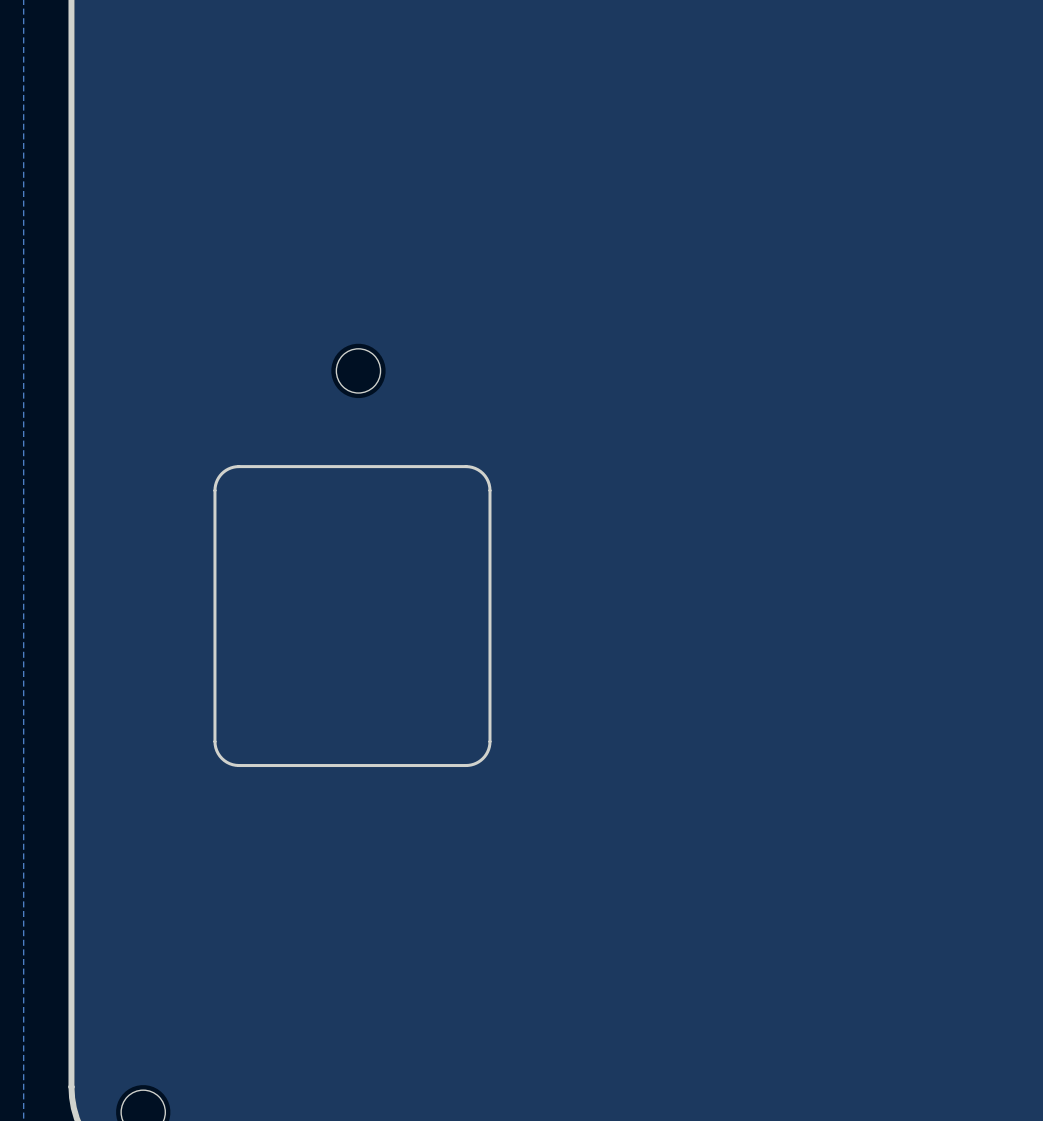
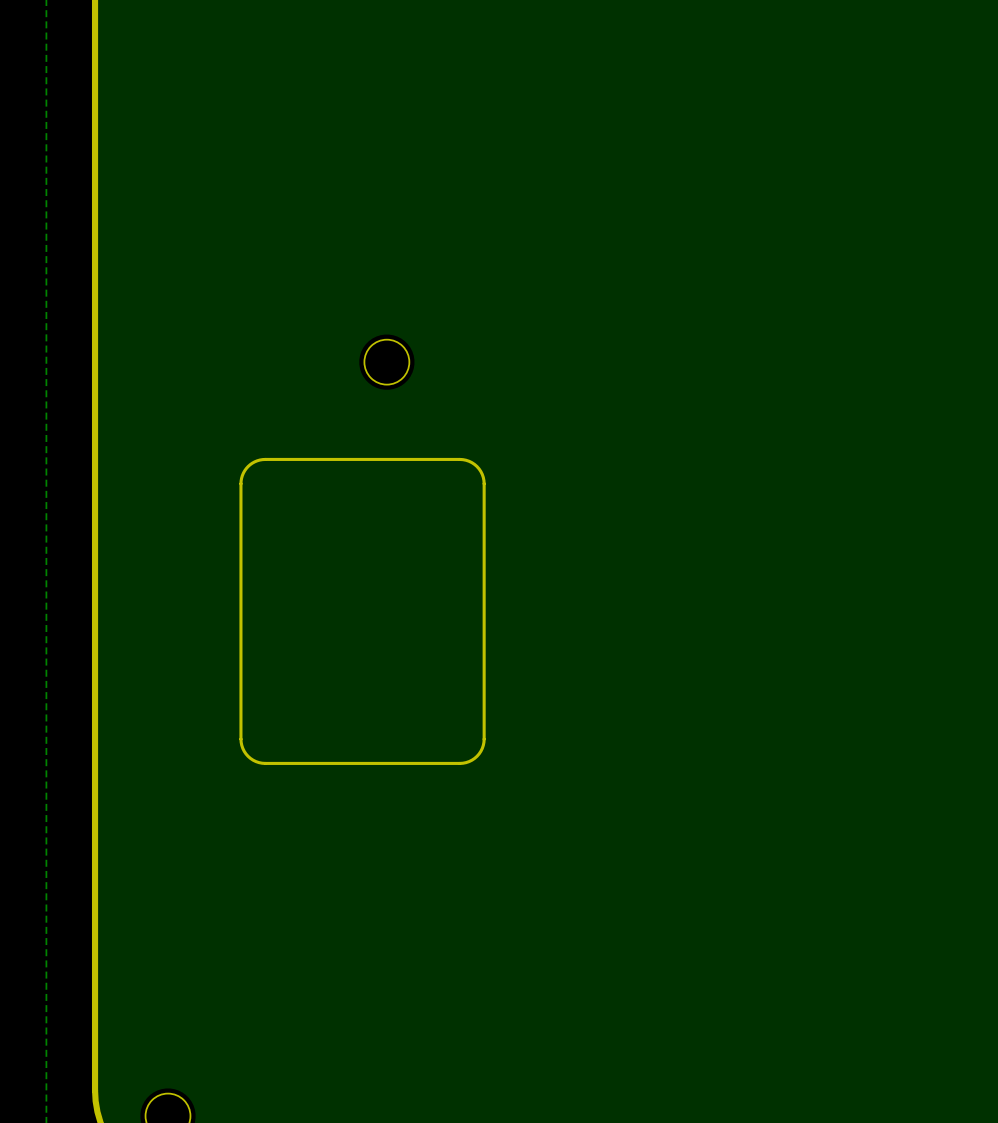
board edge: (430, 466) (475, 468) (485, 475) (489, 490) (489, 746) (484, 756) (473, 764) (430, 765) -> (459, 459) (469, 461) (477, 466) (482, 474) (484, 483) (483, 742) (480, 751) (474, 758) (459, 763)

